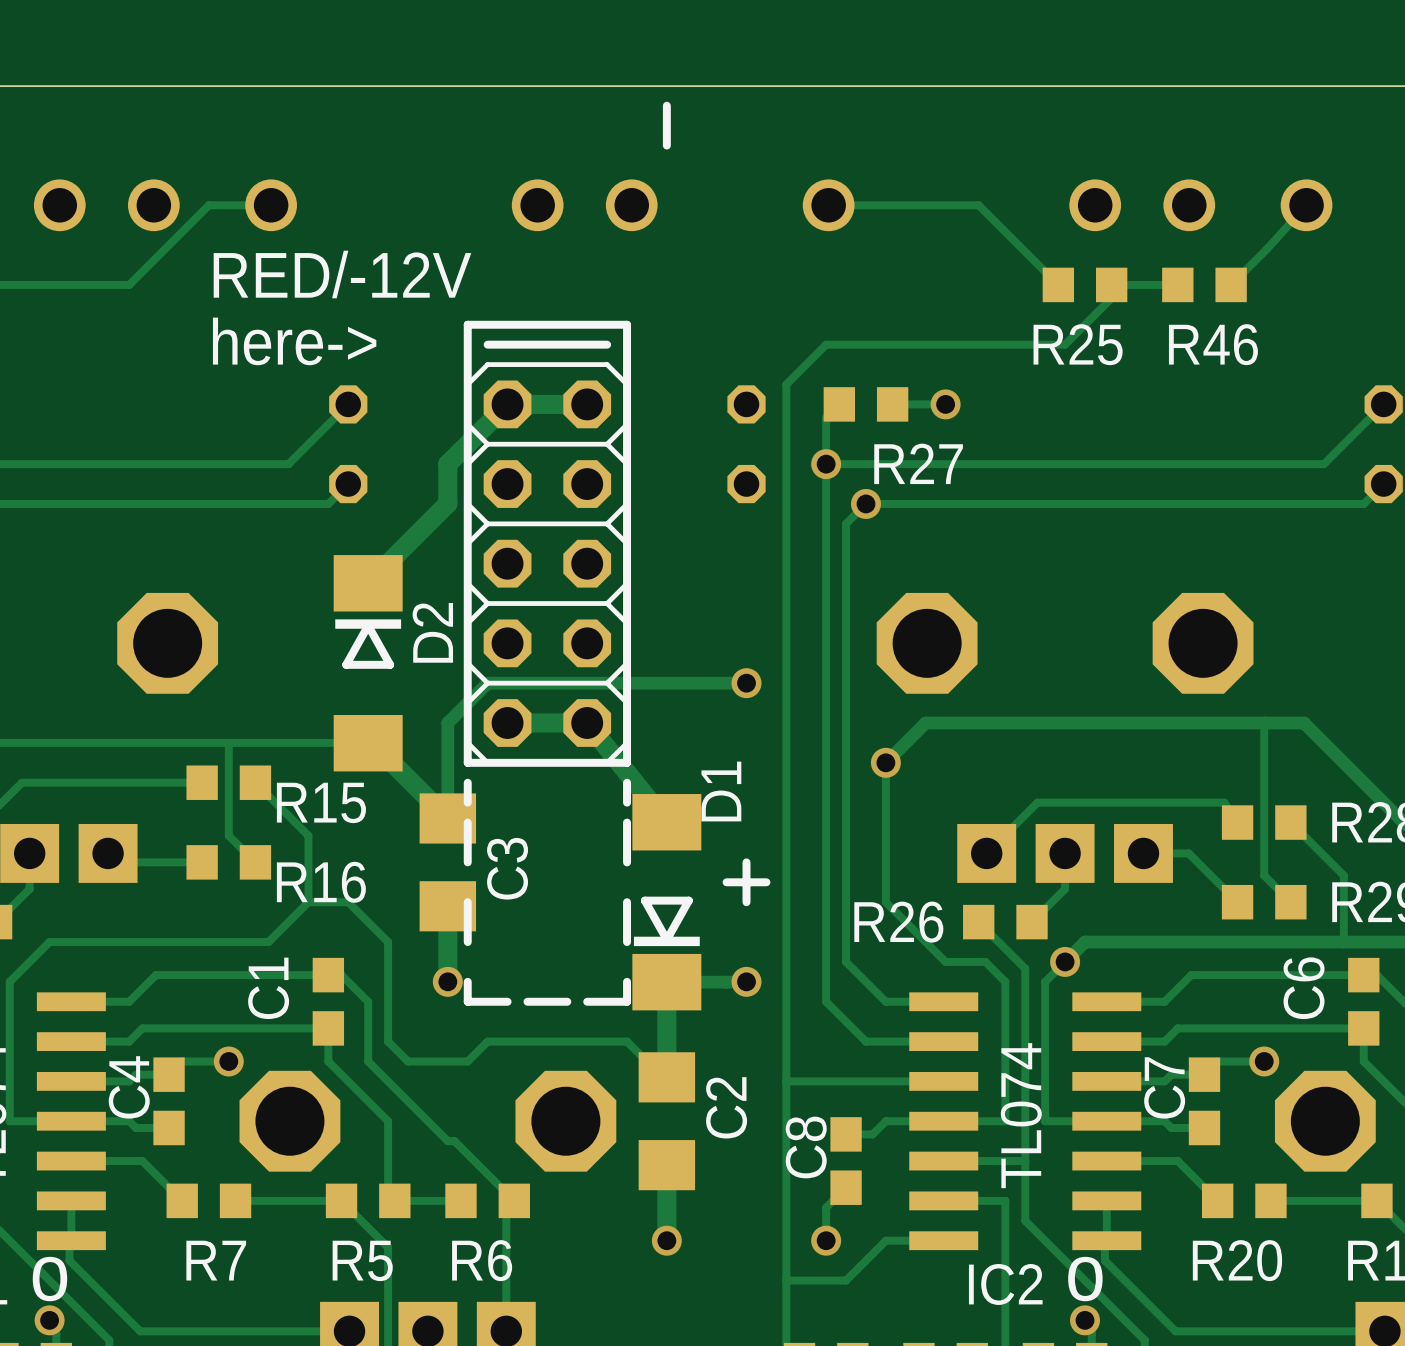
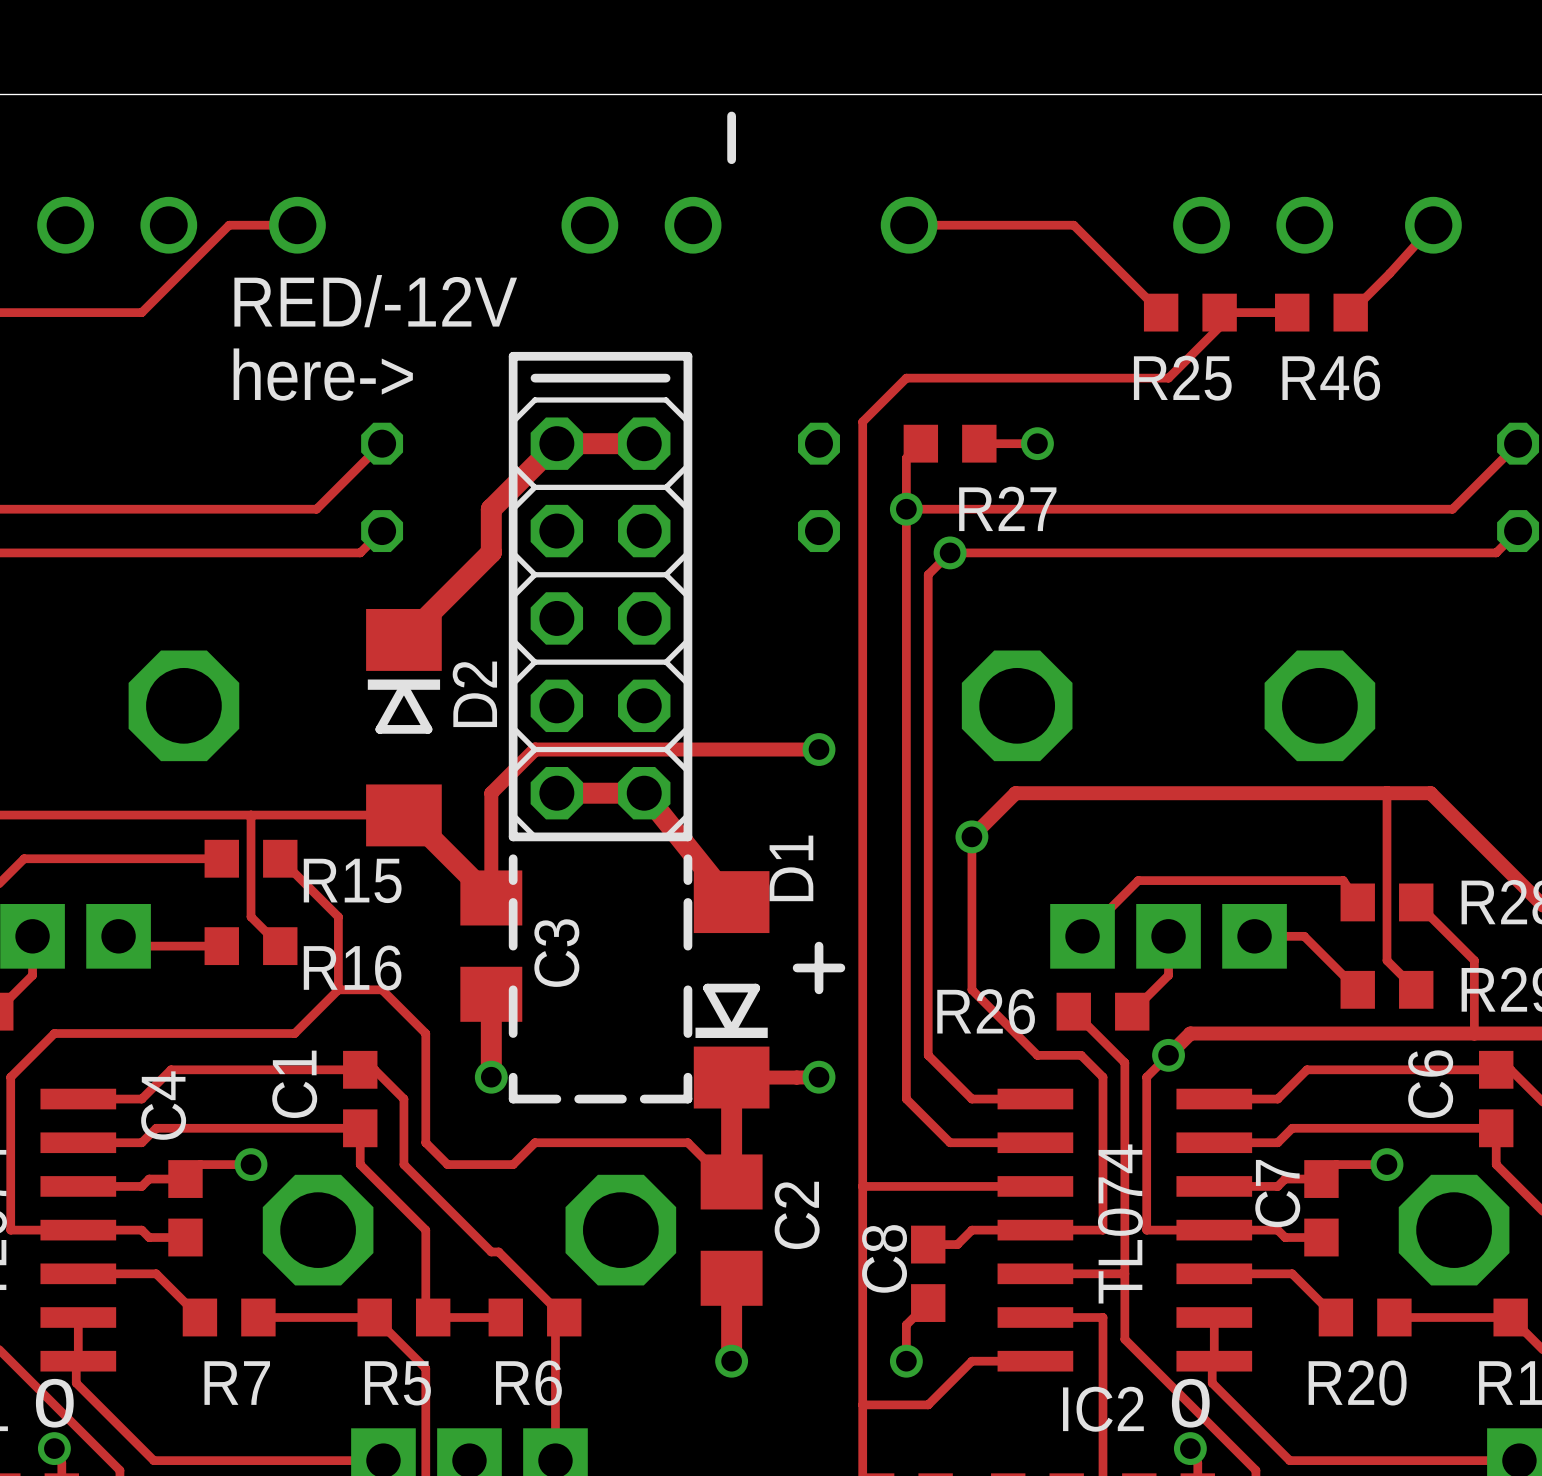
C4 name position: C4 (129, 1087) -> C4 (163, 1105)

